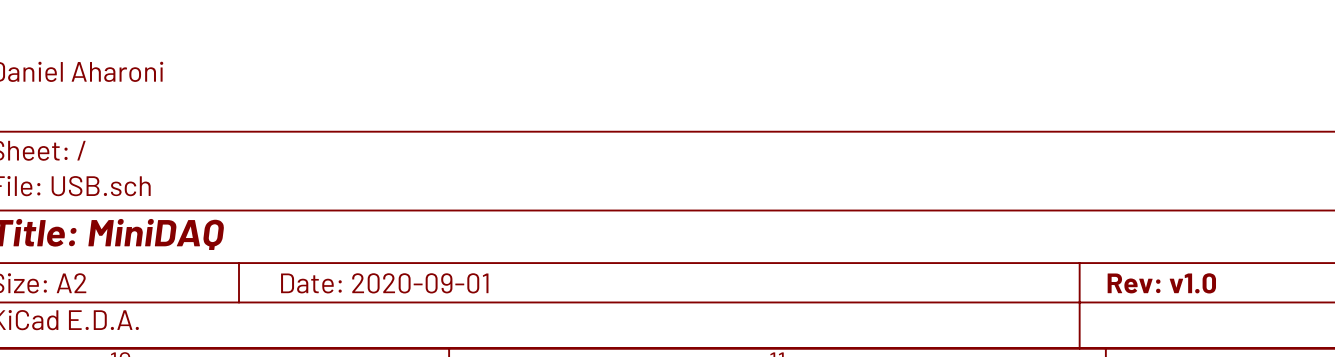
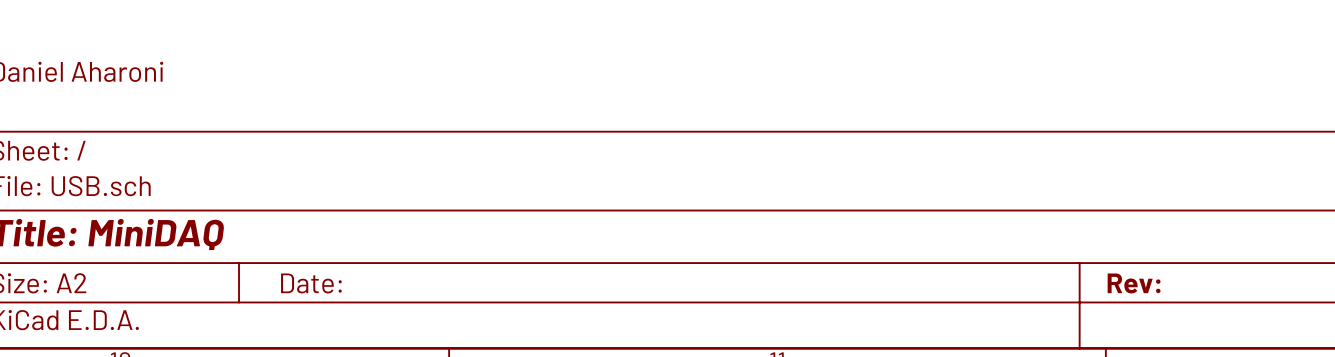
title block: Date: 2020-09-01 (384, 283) -> Date: (311, 283)
title block: Rev: v1.0 (1161, 283) -> Rev: (1134, 283)

